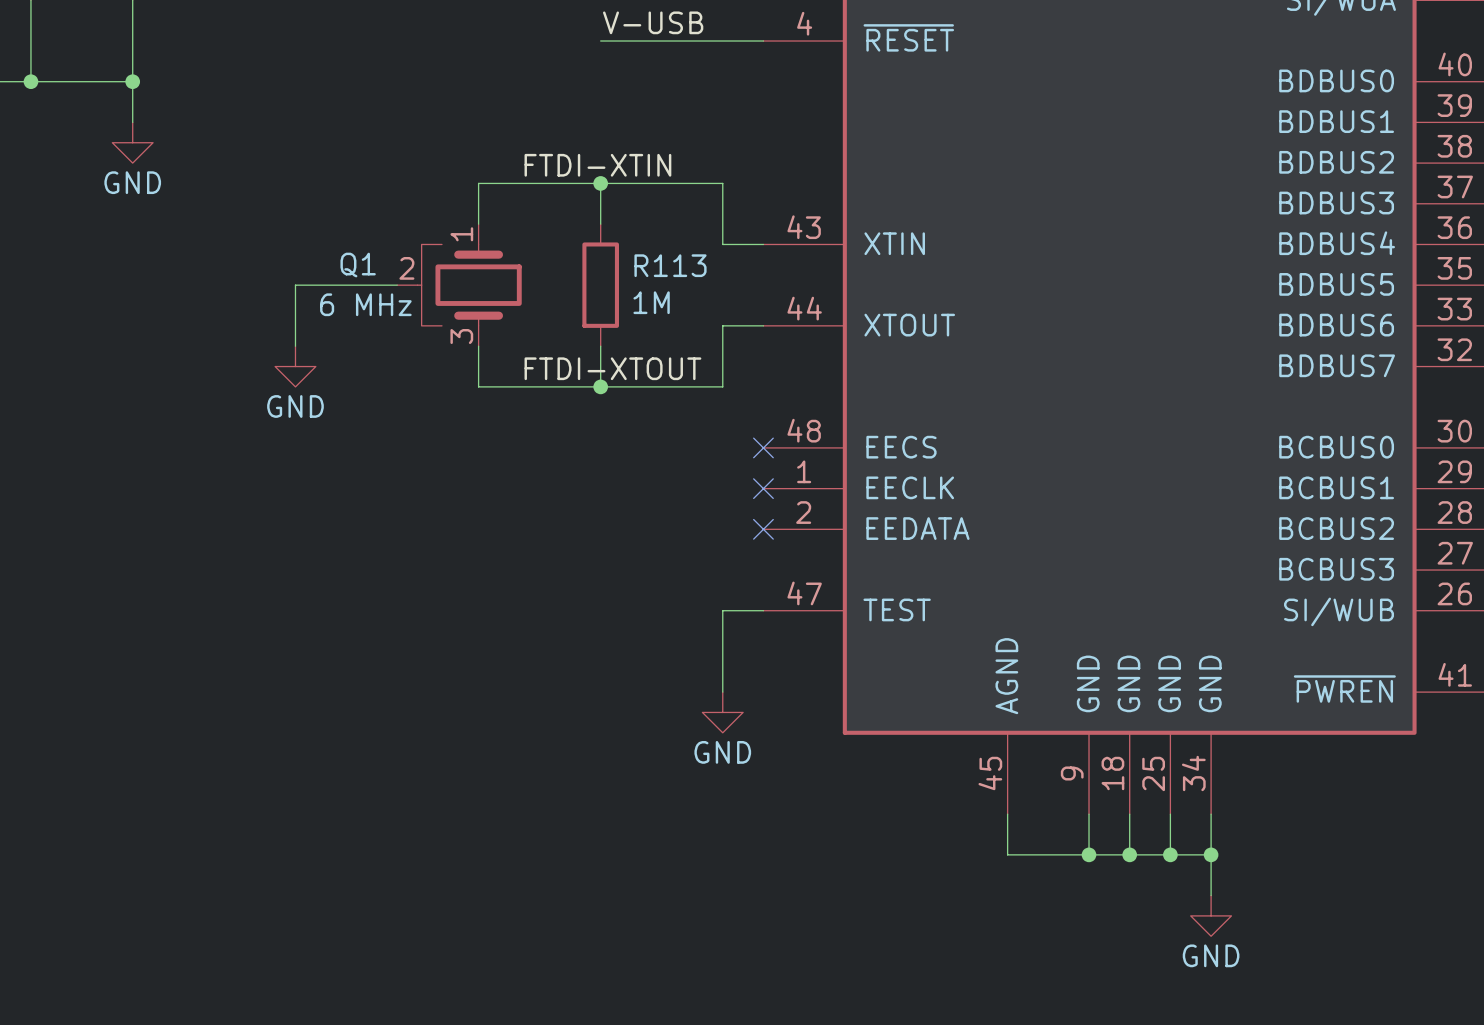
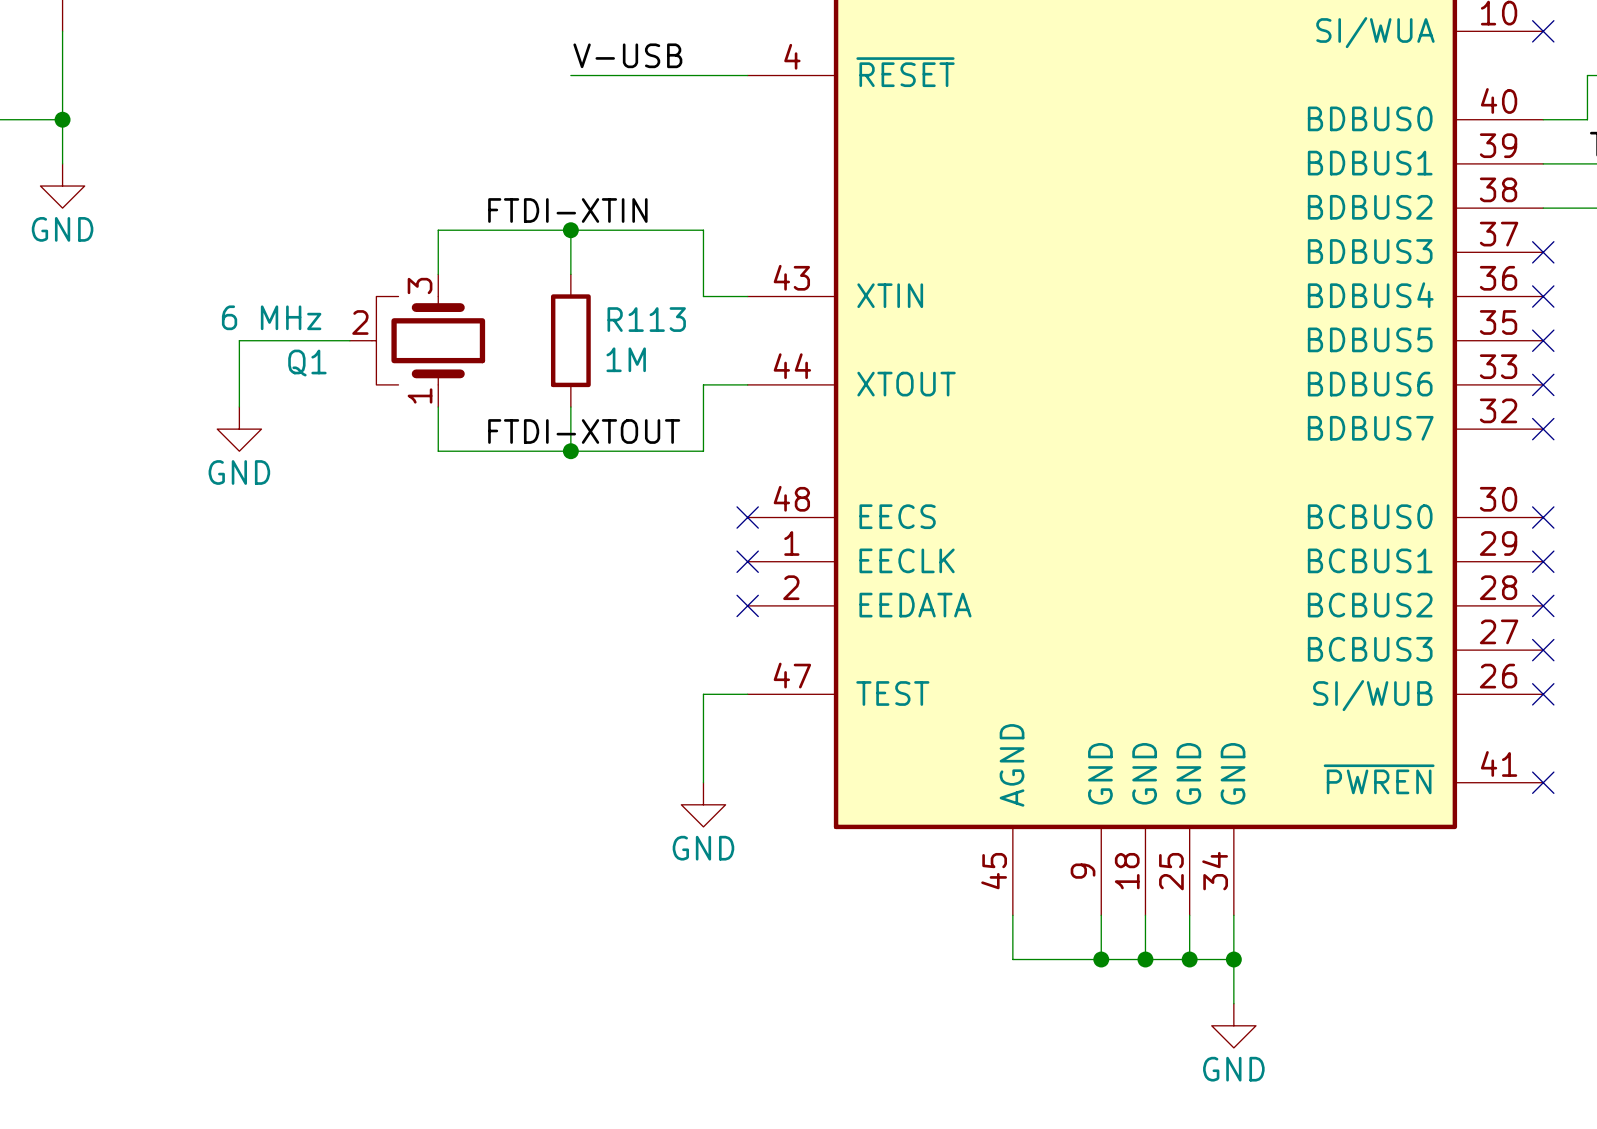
Q1 flip: as is (469, 285) -> up-down (428, 340)
Q1 value position: 6 MHz (365, 304) -> 6 MHz (271, 317)

